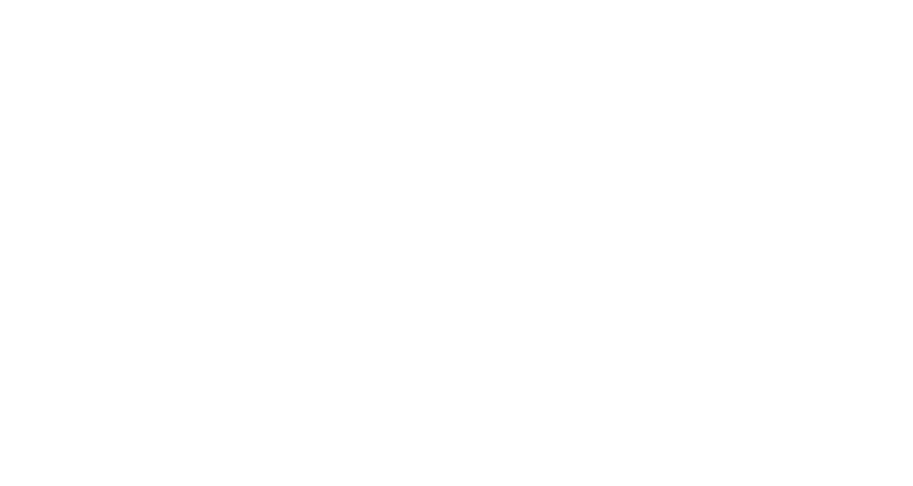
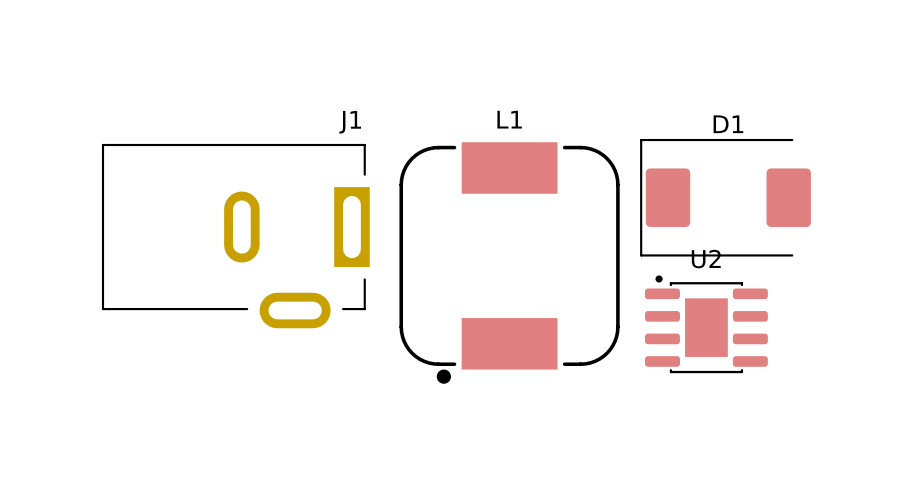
D1: none -> (725, 197)
J1: none -> (235, 236)
L1: none -> (509, 263)
U2: none -> (706, 324)

